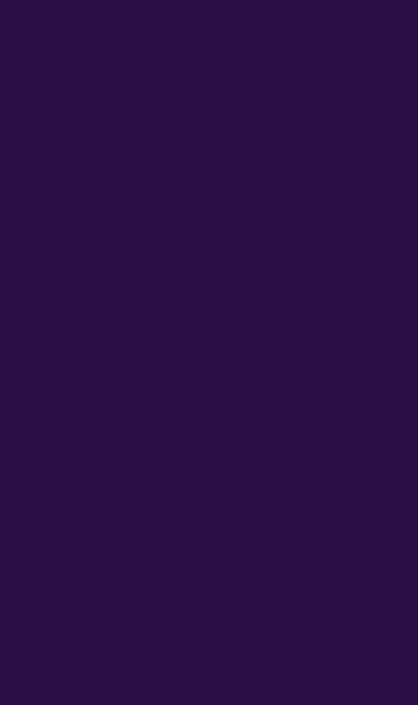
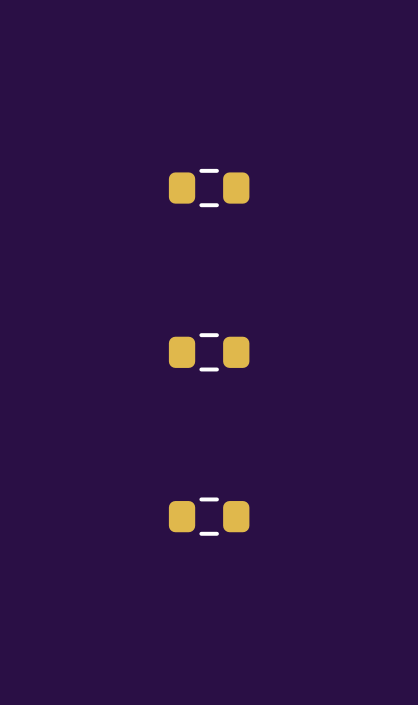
part: none -> (209, 188)
part: none -> (209, 352)
part: none -> (209, 516)

